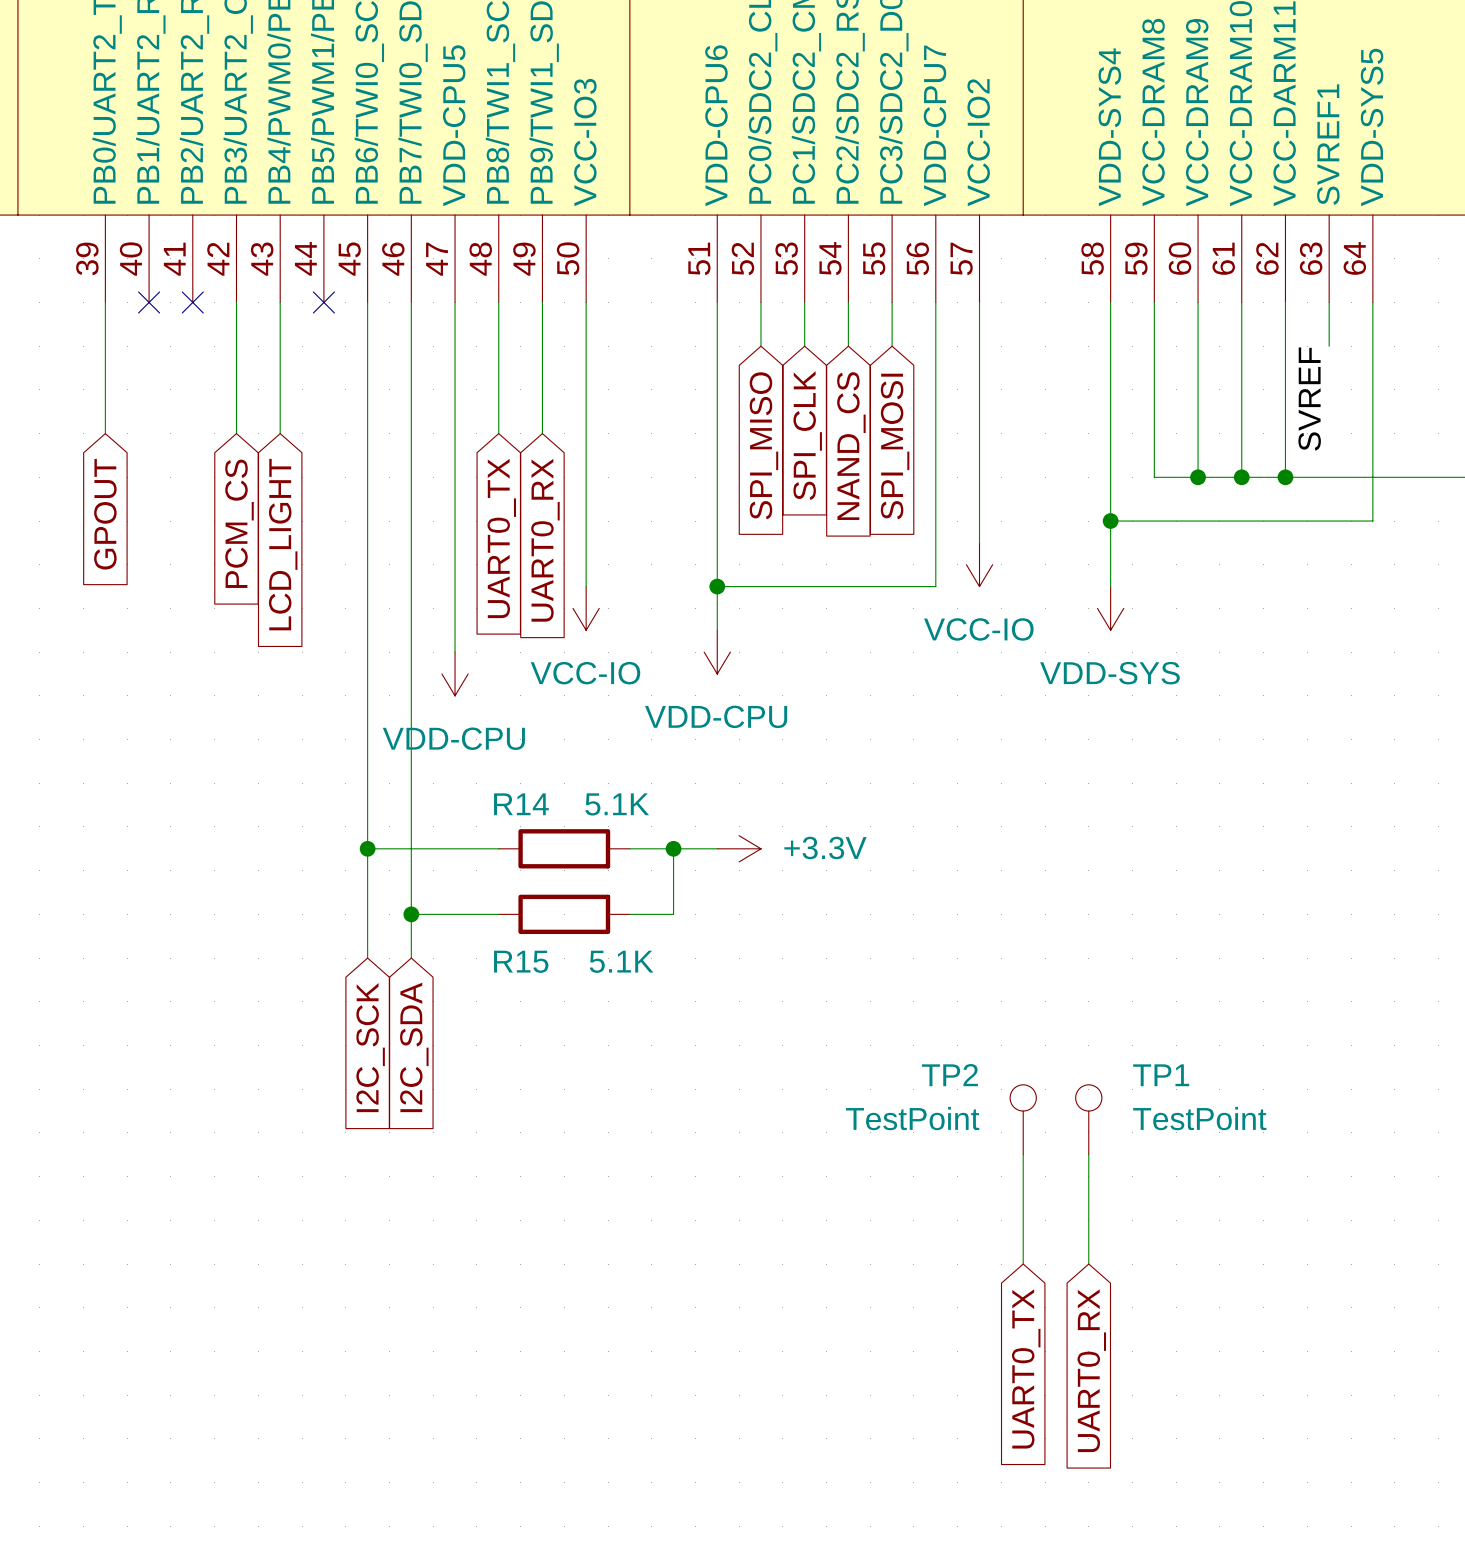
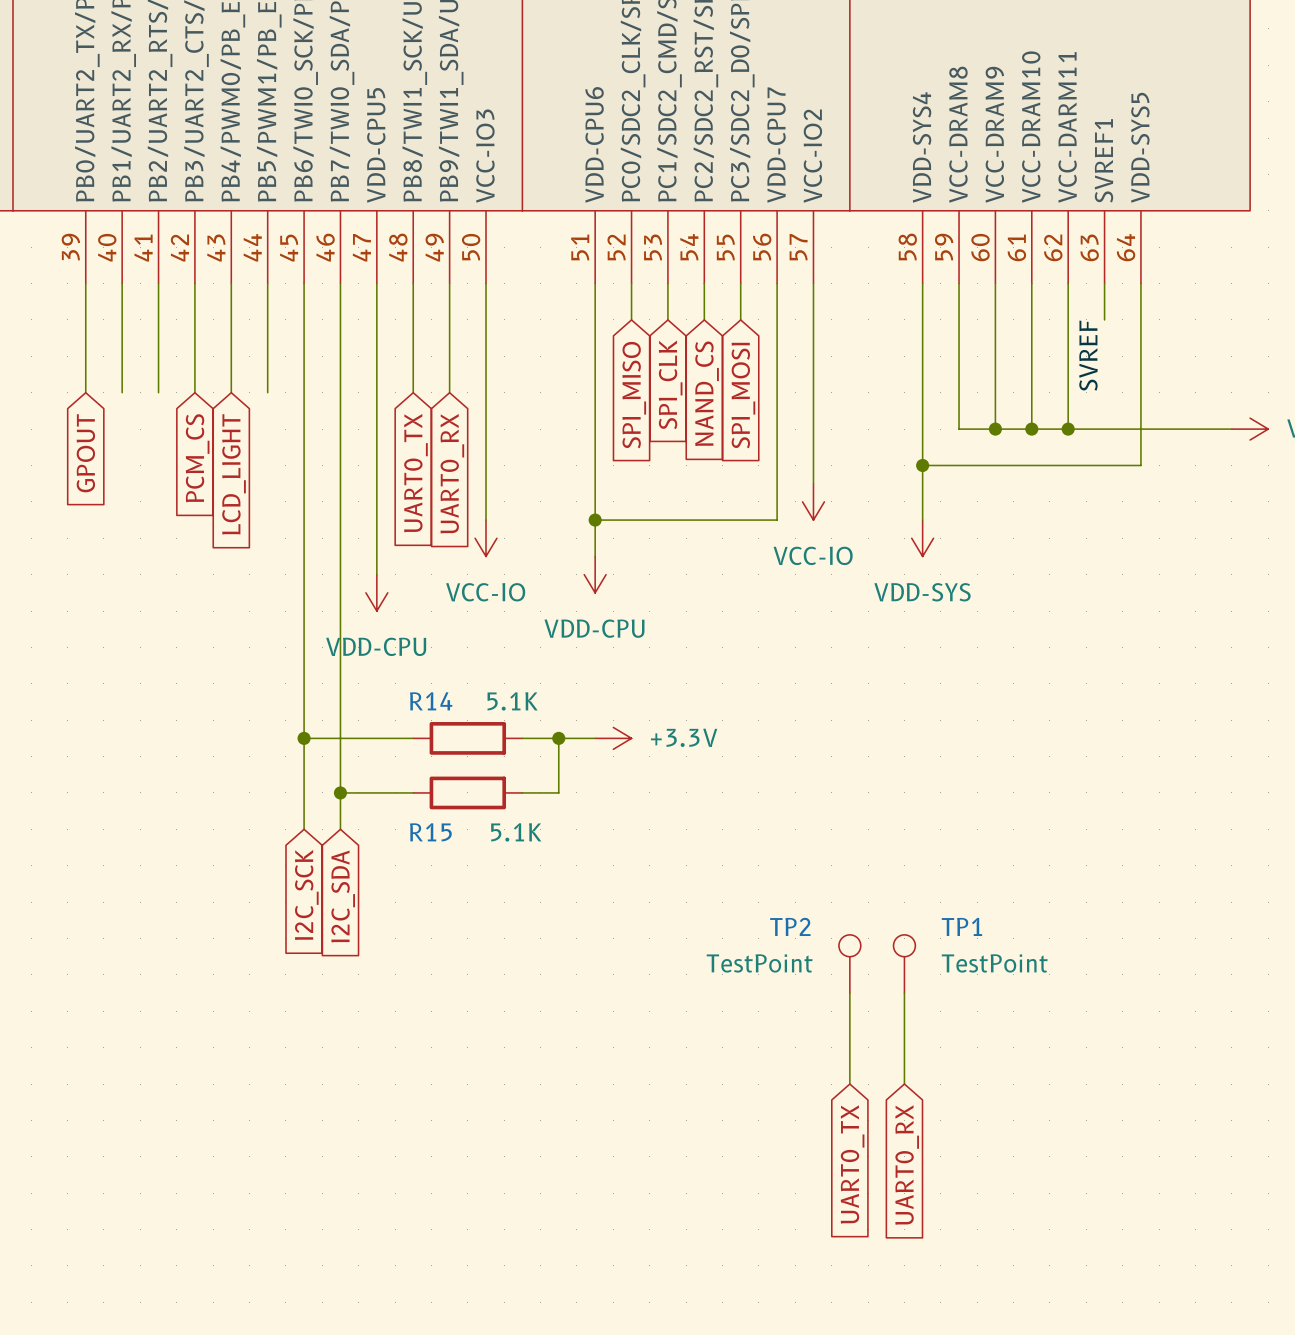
wire: none -> (122, 283) (122, 392)
no-connect mark: (149, 302) -> none
wire: none -> (158, 283) (158, 392)
no-connect mark: (192, 302) -> none
wire: none -> (267, 283) (267, 392)
no-connect mark: (323, 302) -> none

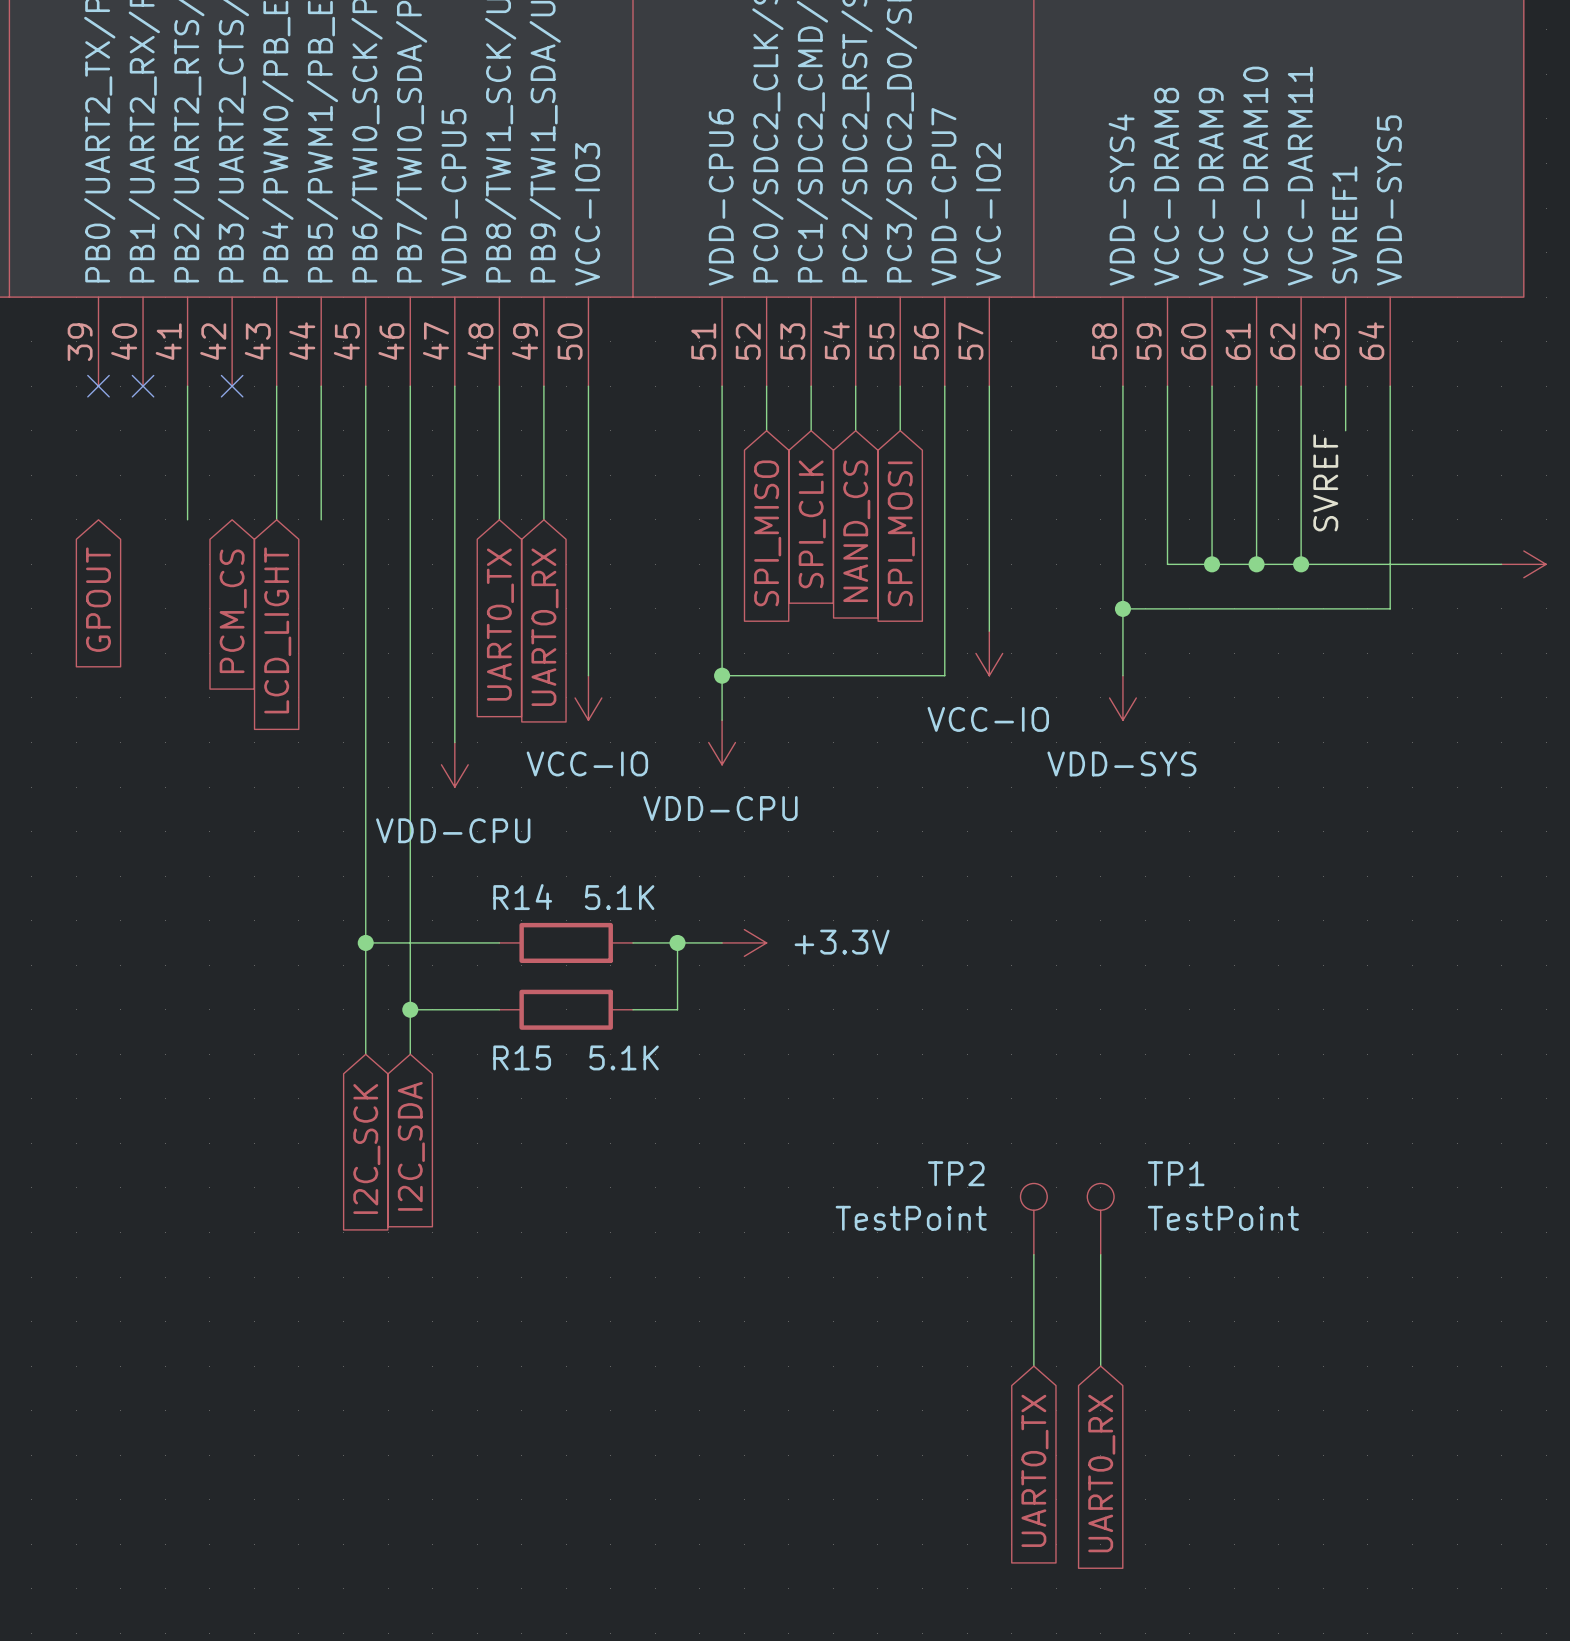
wire: (85, 283) (85, 392) -> none
no-connect mark: none -> (98, 386)
wire: (122, 283) (122, 392) -> none
no-connect mark: none -> (143, 386)
wire: (194, 283) (194, 392) -> none
no-connect mark: none -> (232, 386)

